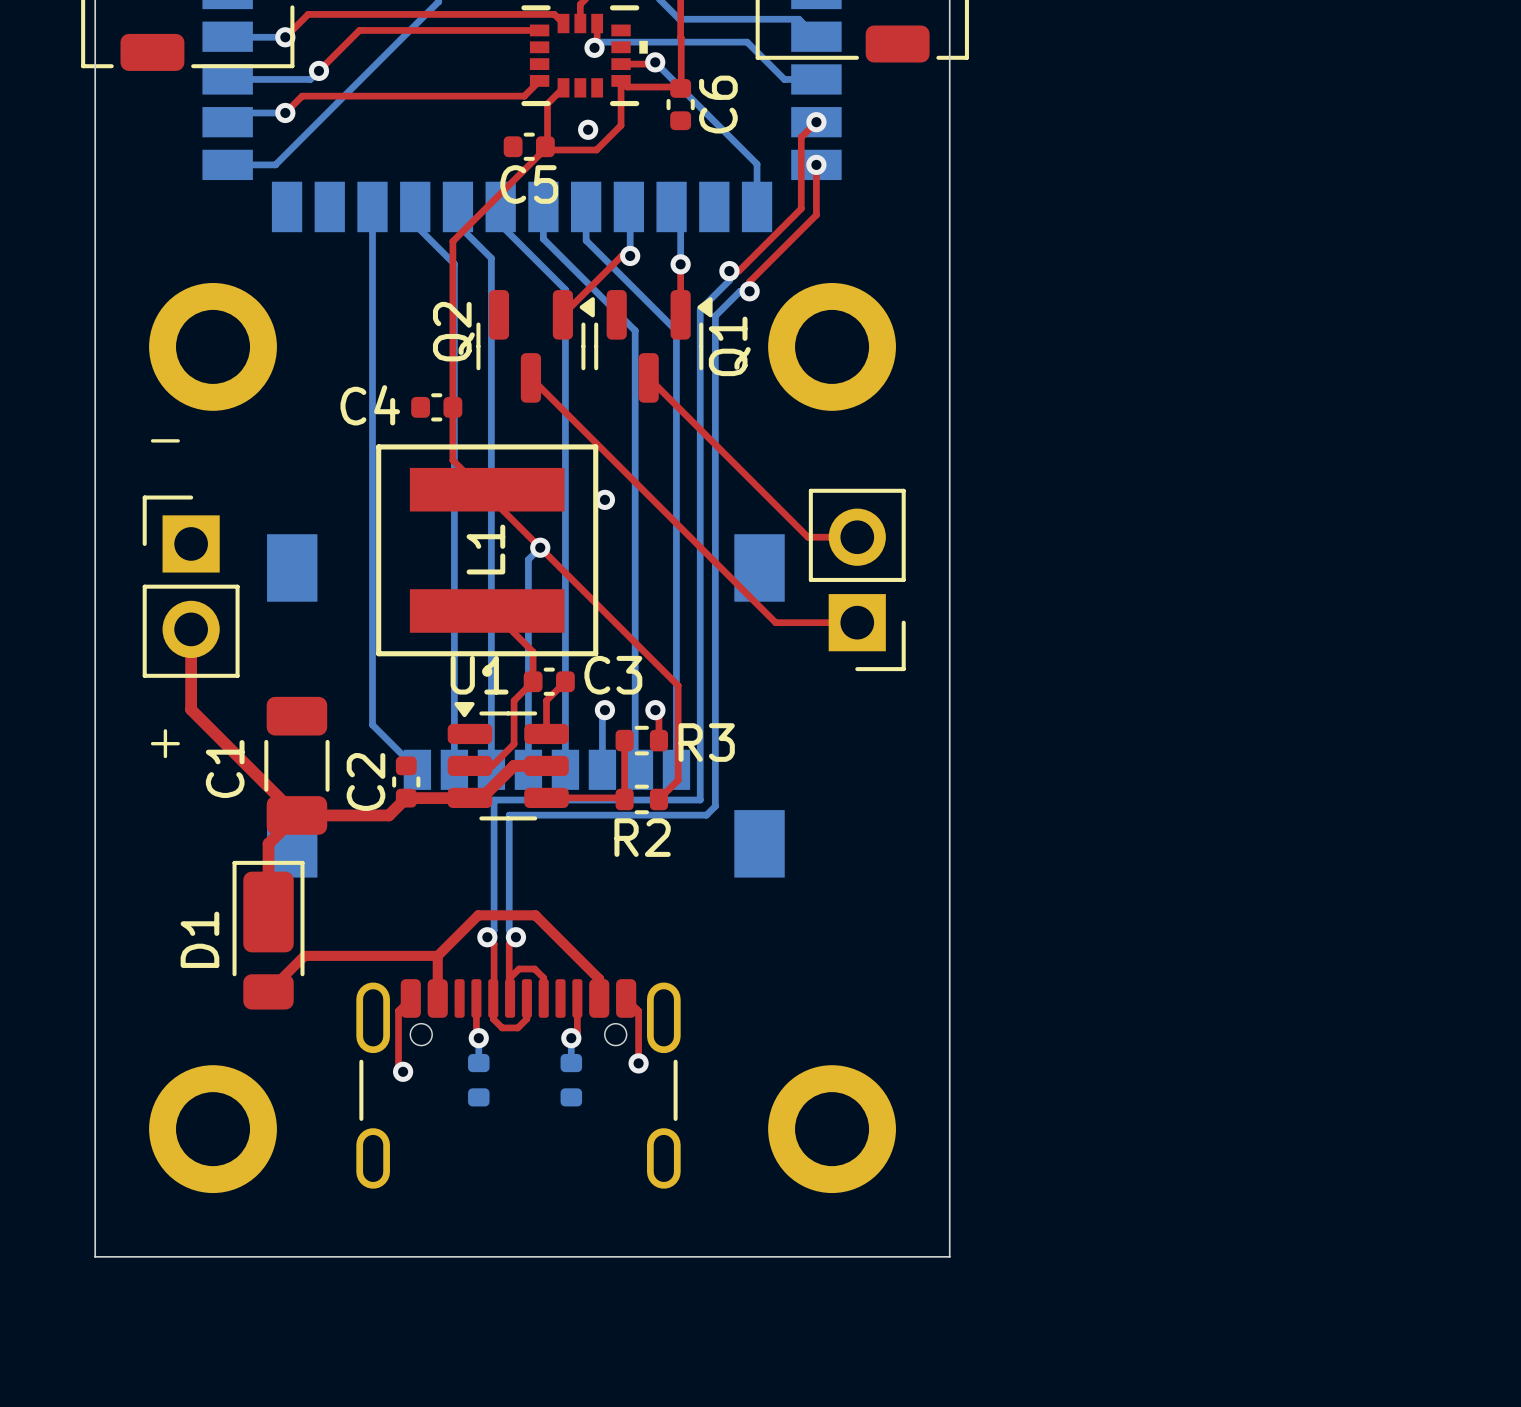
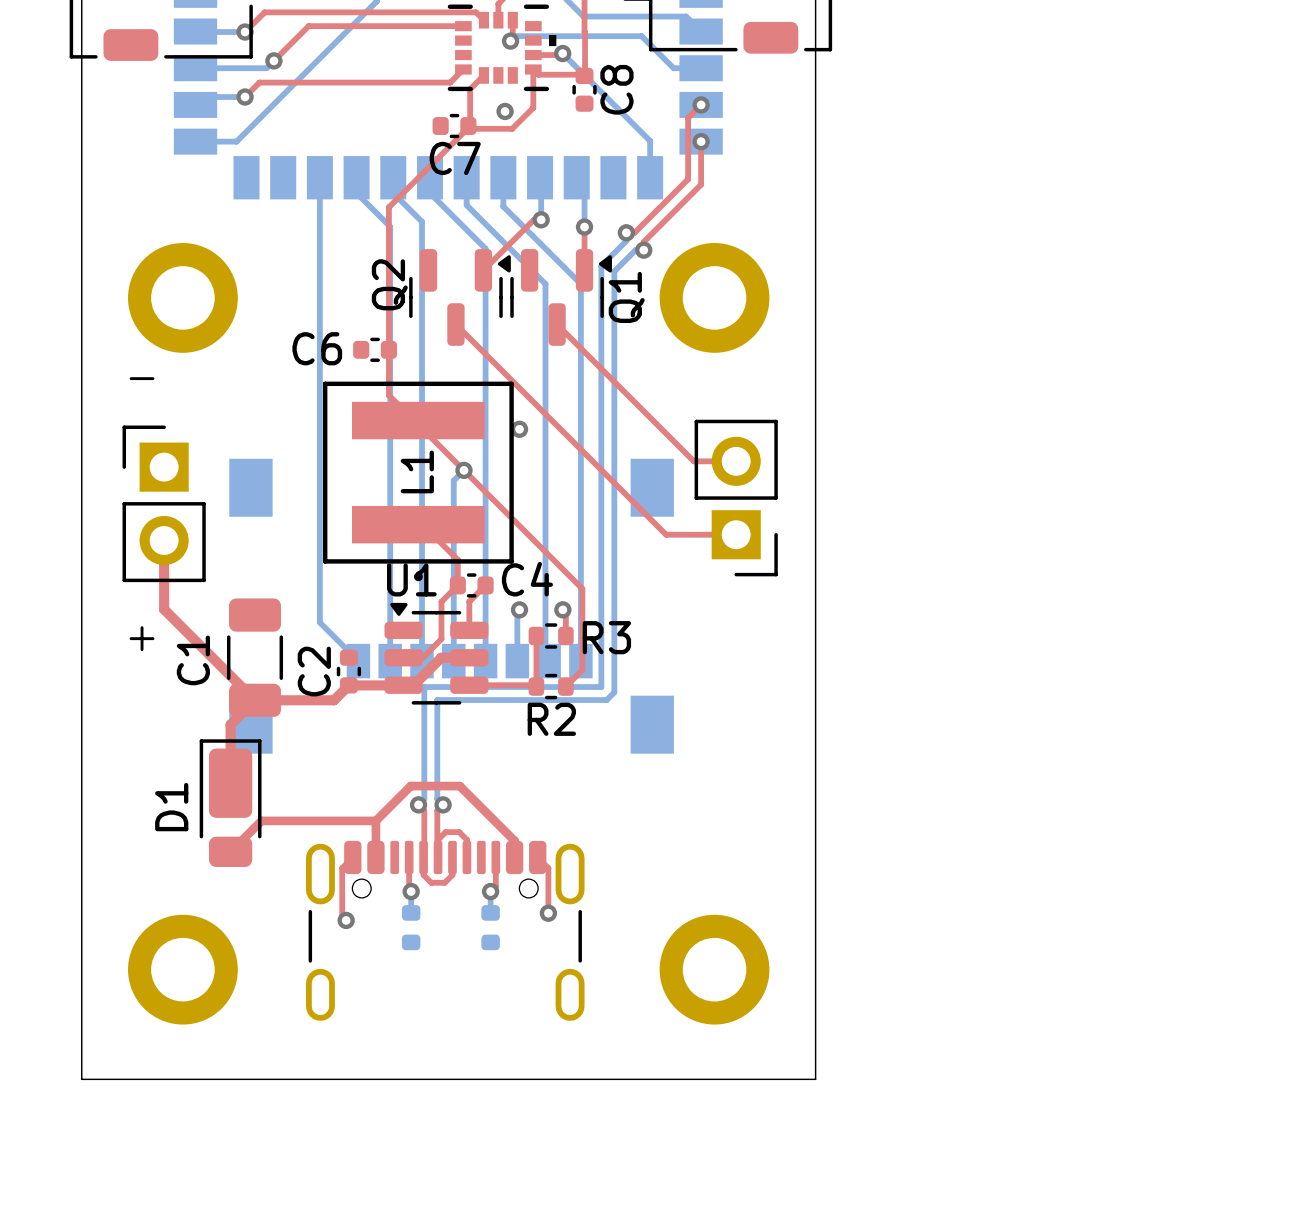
C6 name: C6 (718, 104) -> C8 (616, 89)
C5 name: C5 (529, 184) -> C7 (455, 158)
C4 name: C4 (370, 405) -> C6 (317, 348)
C3 name: C3 (613, 675) -> C4 (527, 579)

